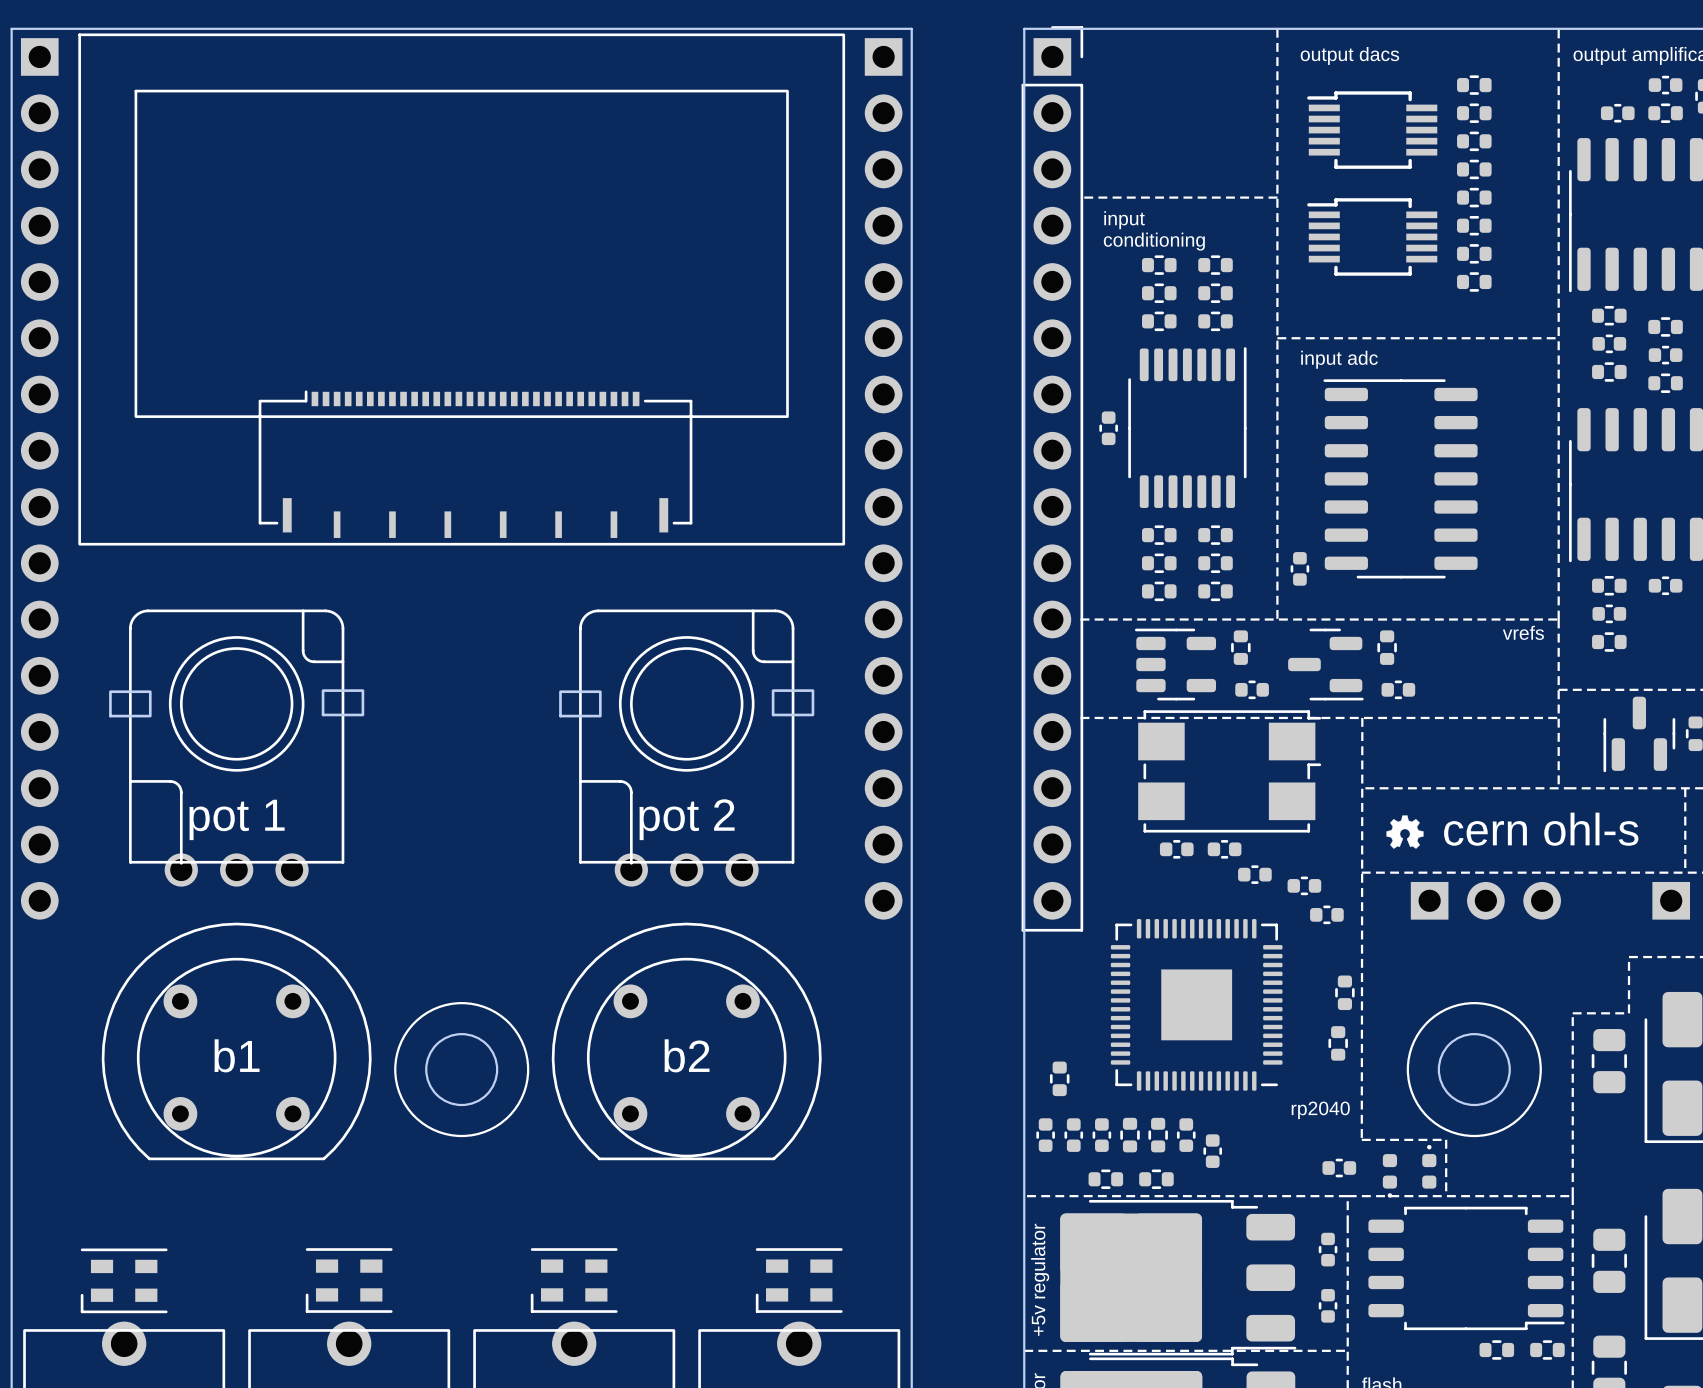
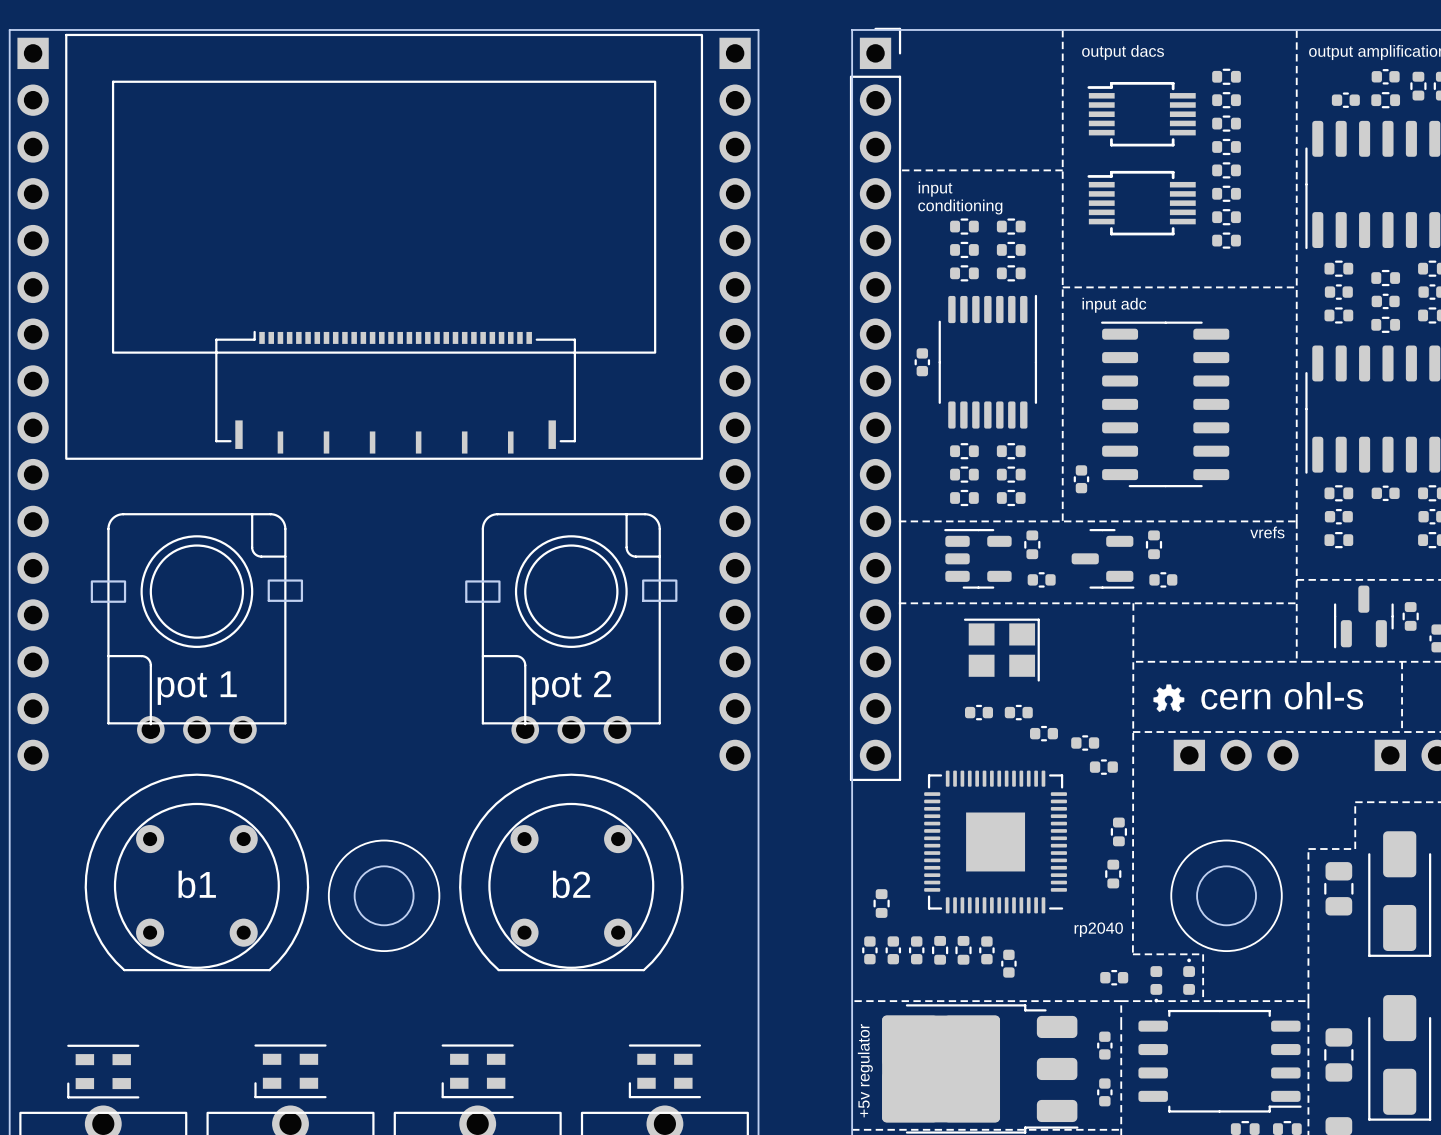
part: (1229, 771) -> none
part: none -> (1001, 650)
part: (1105, 1179) -> none
part: (1156, 1179) -> none

